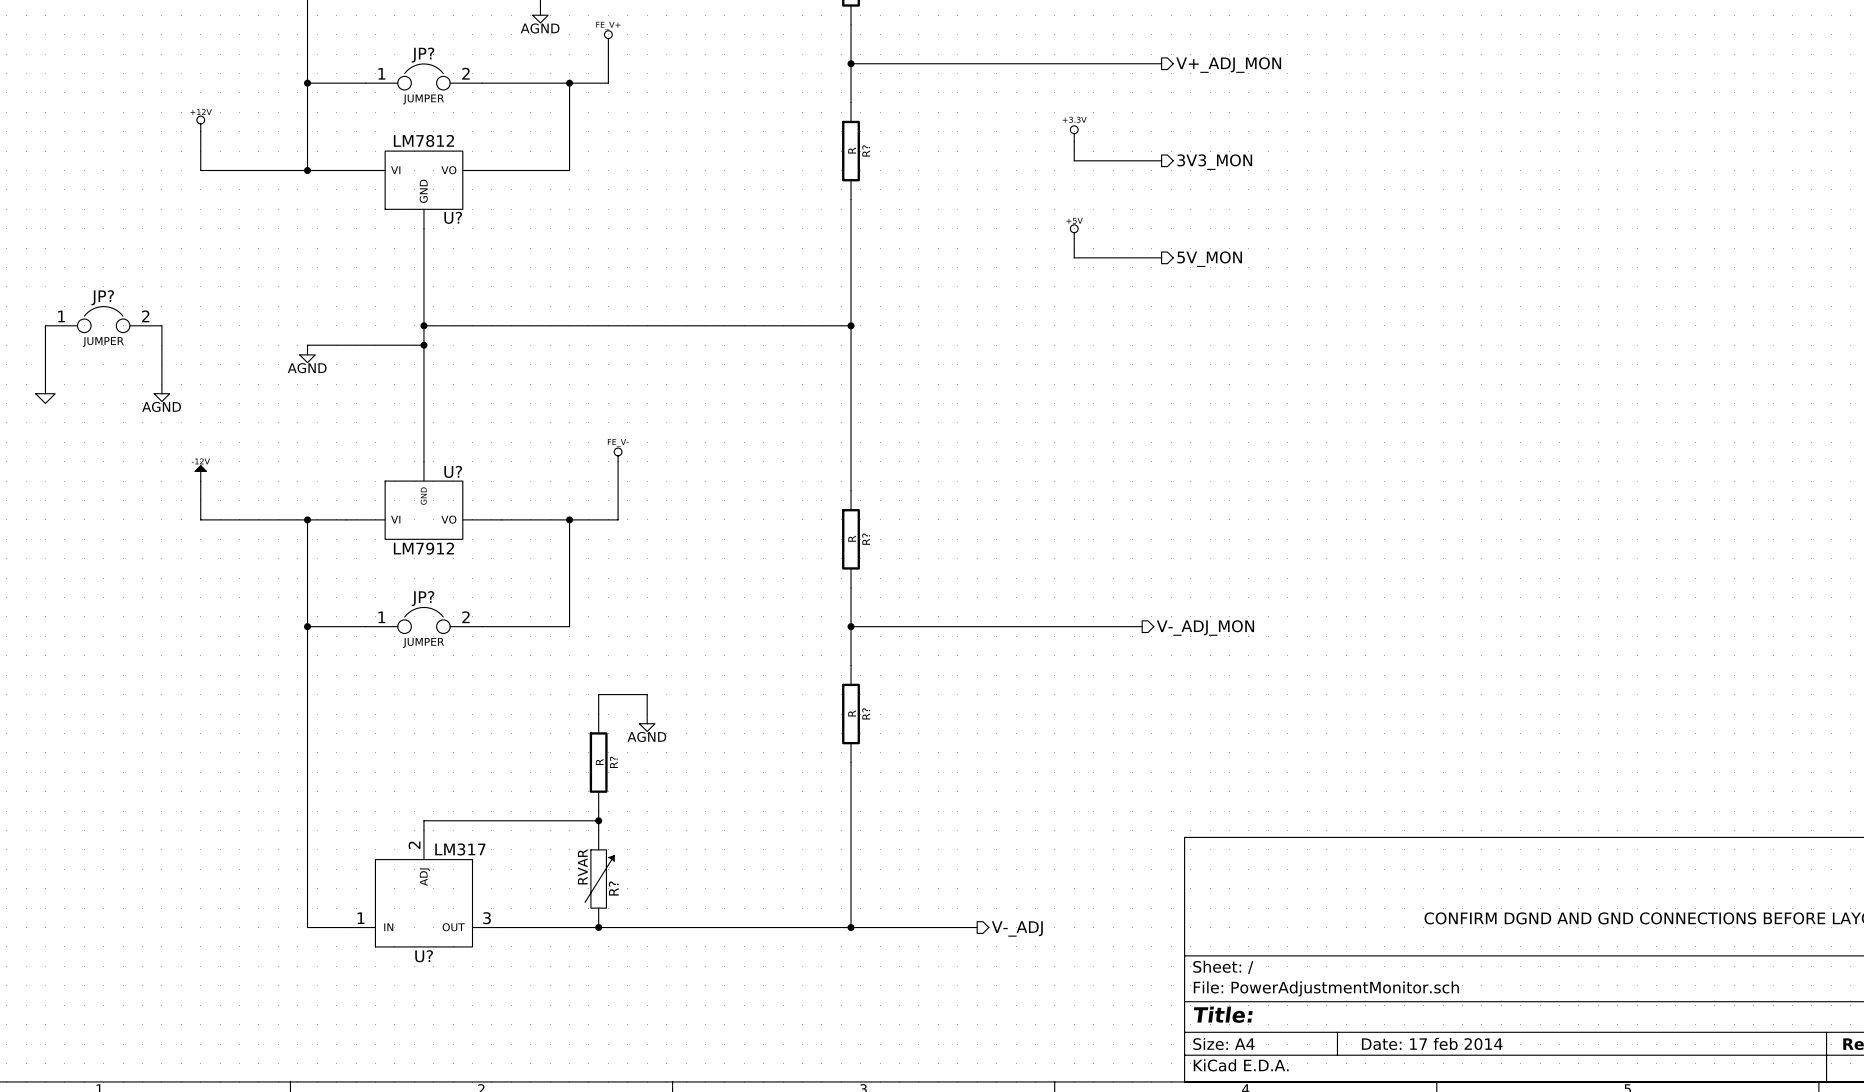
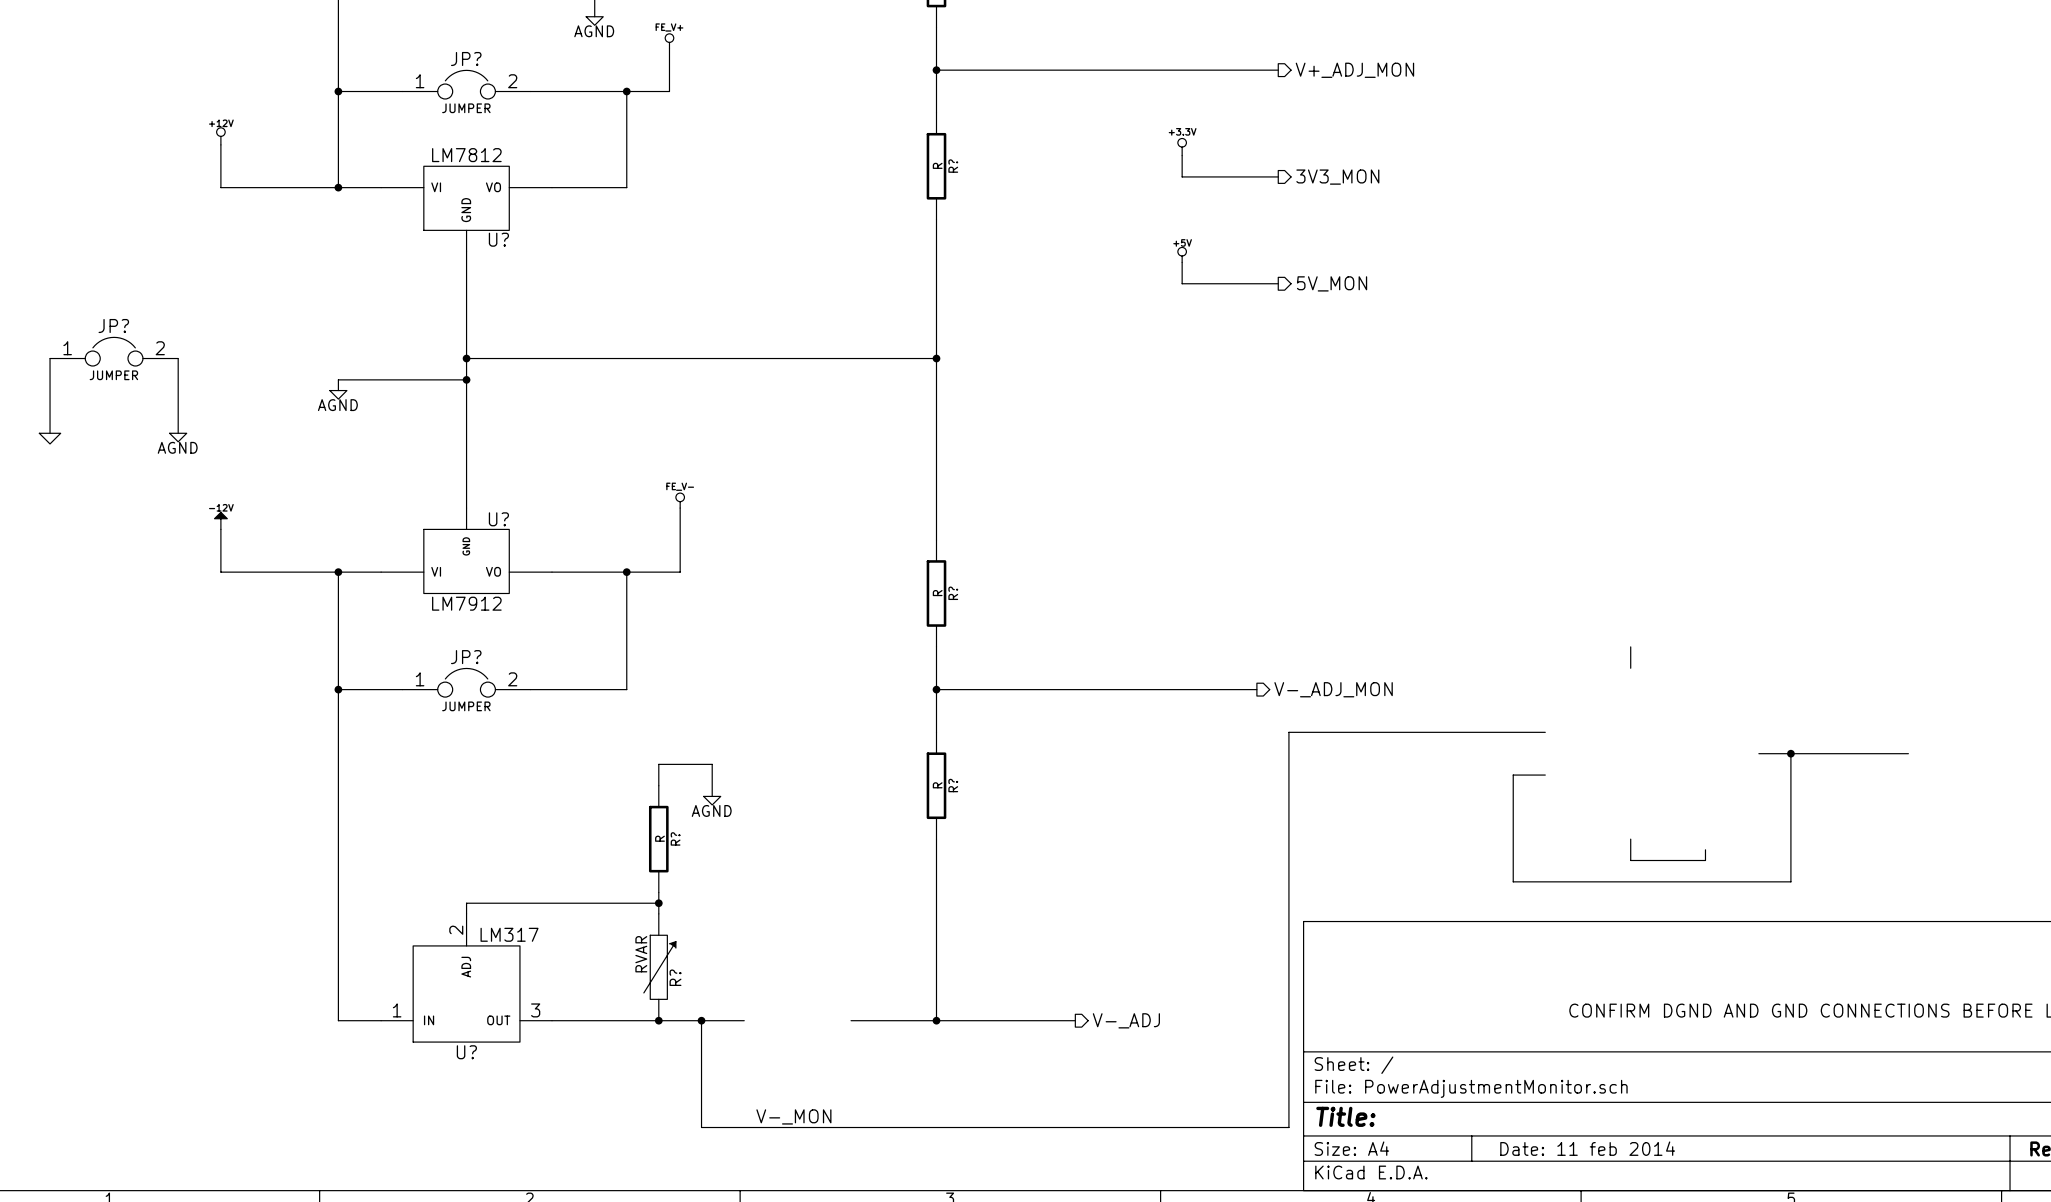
wire: none -> (1630, 646) (1630, 668)
wire: none -> (1545, 732) (1288, 732) (1288, 1127) (701, 1127) (701, 1020)
wire: none -> (1758, 753) (1908, 753)
wire: none -> (1790, 753) (1790, 881) (1513, 881) (1513, 775) (1545, 775)
junction: none -> (1790, 753)
wire: none -> (1630, 839) (1630, 860) (1705, 860) (1705, 849)
junction: none -> (701, 1020)
wire: (676, 927) (773, 927) -> none
label: none -> V-_MON (793, 1116)
title block: Date: 17 feb 2014 (1432, 1043) -> Date: 11 feb 2014 (1587, 1148)

